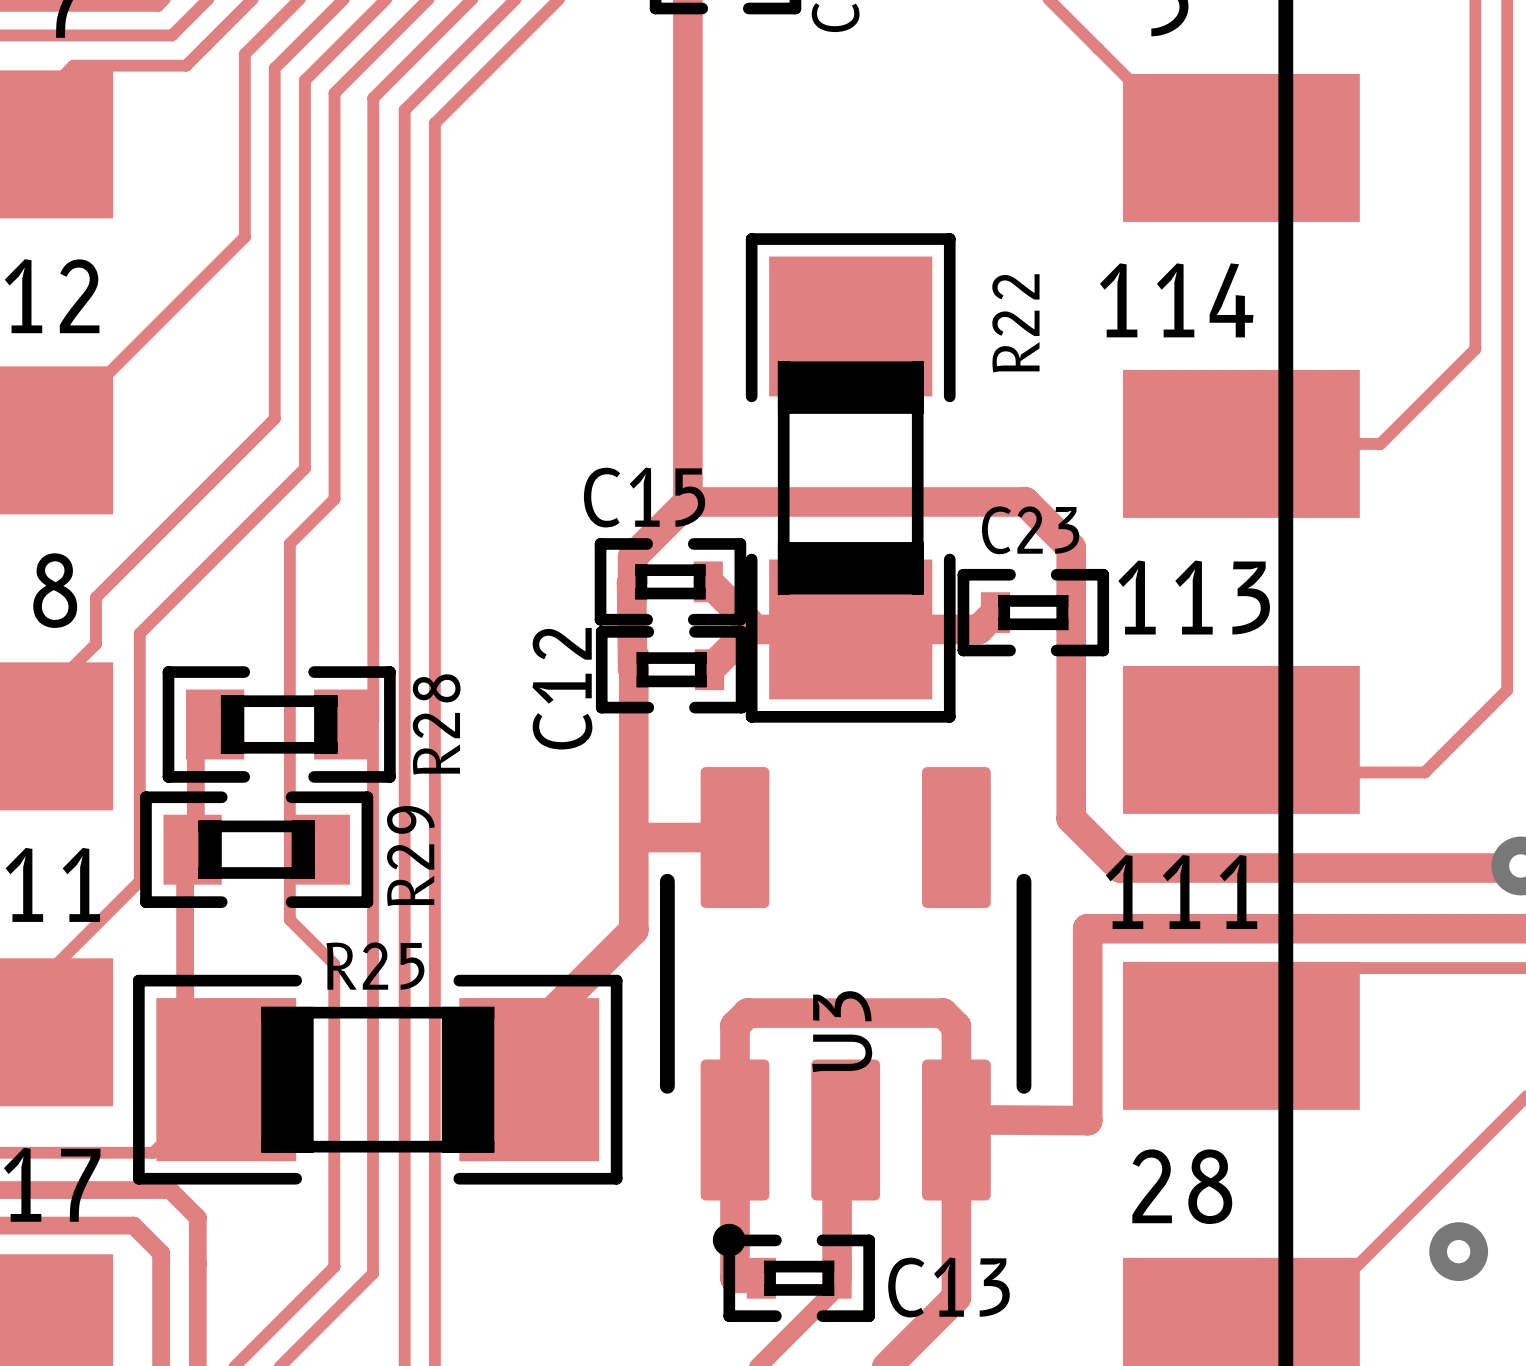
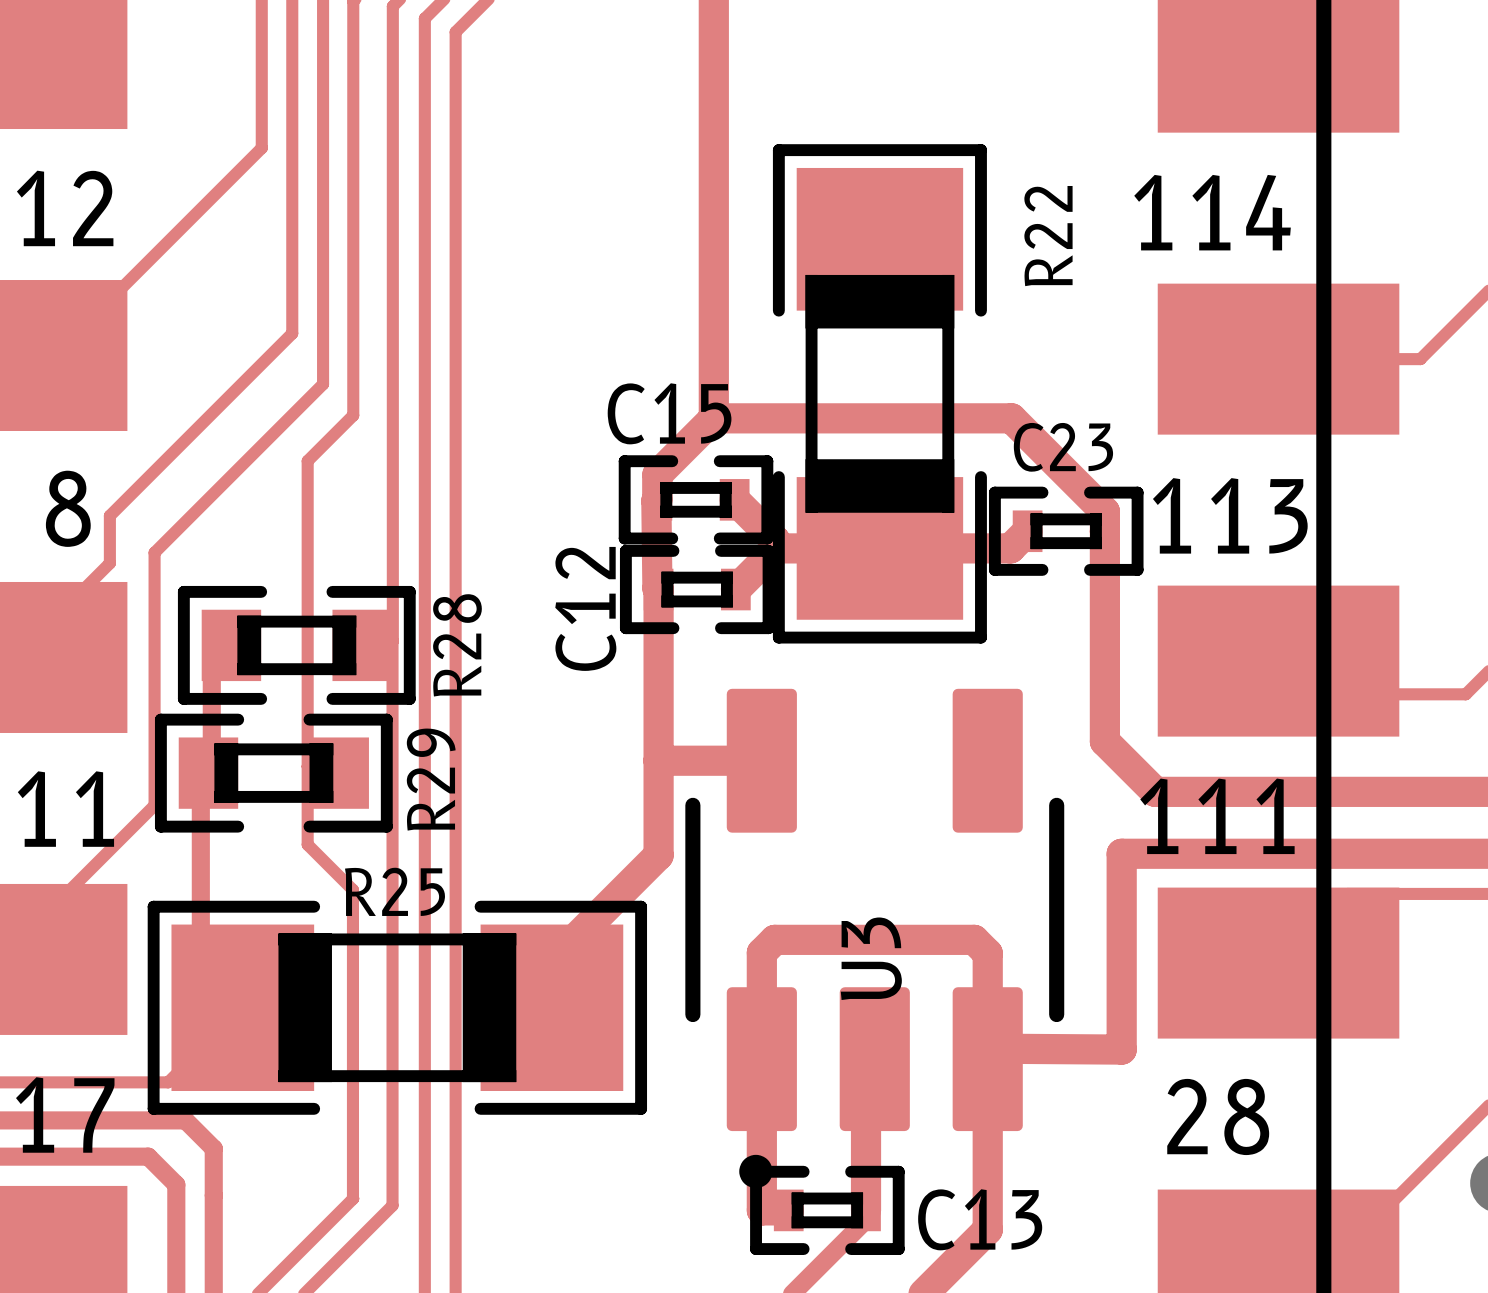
track: (979, 501) (1025, 501) (1071, 547) (1071, 593) -> (1011, 418) (1104, 511)

